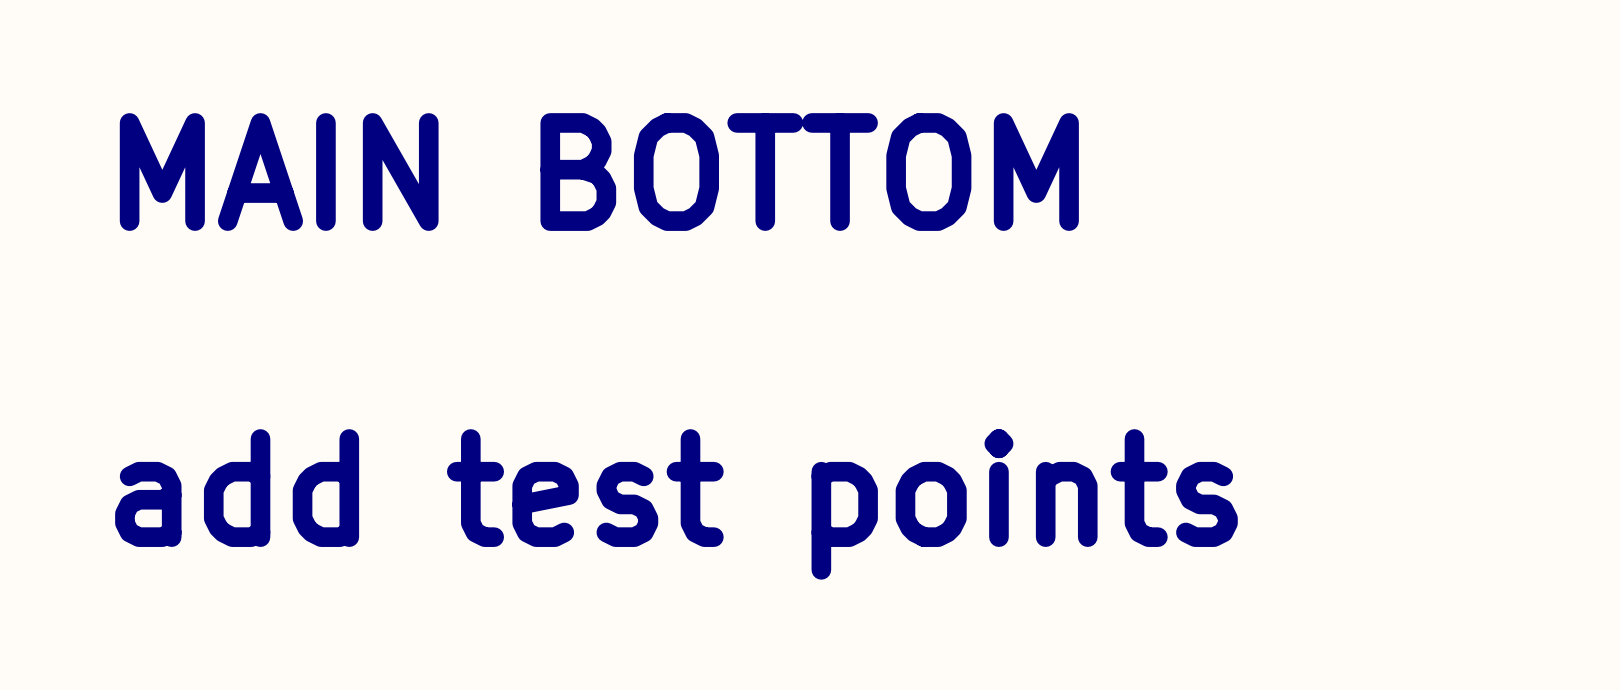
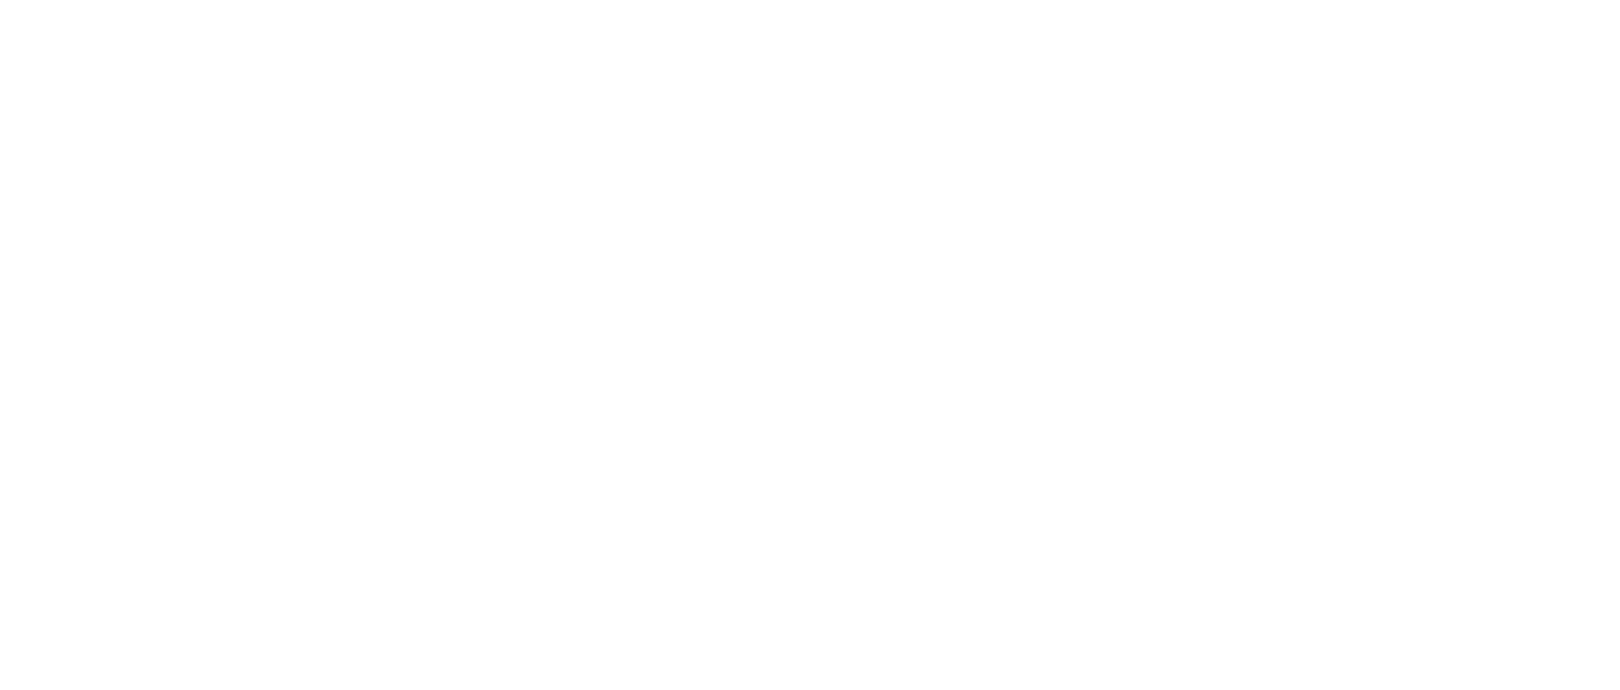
text: MAIN BOTTOM (599, 172) -> none
text: add test points (676, 504) -> none

